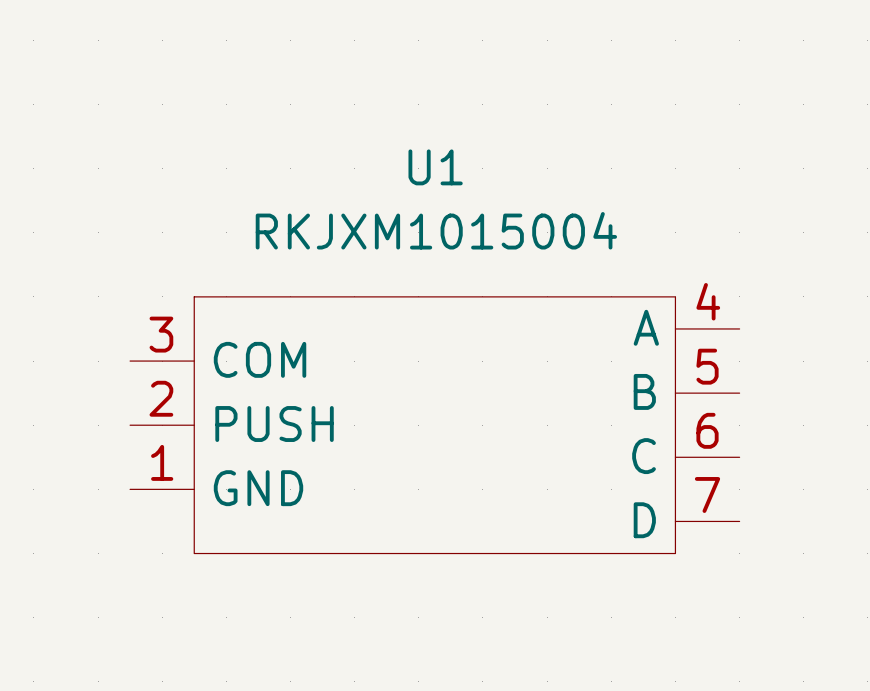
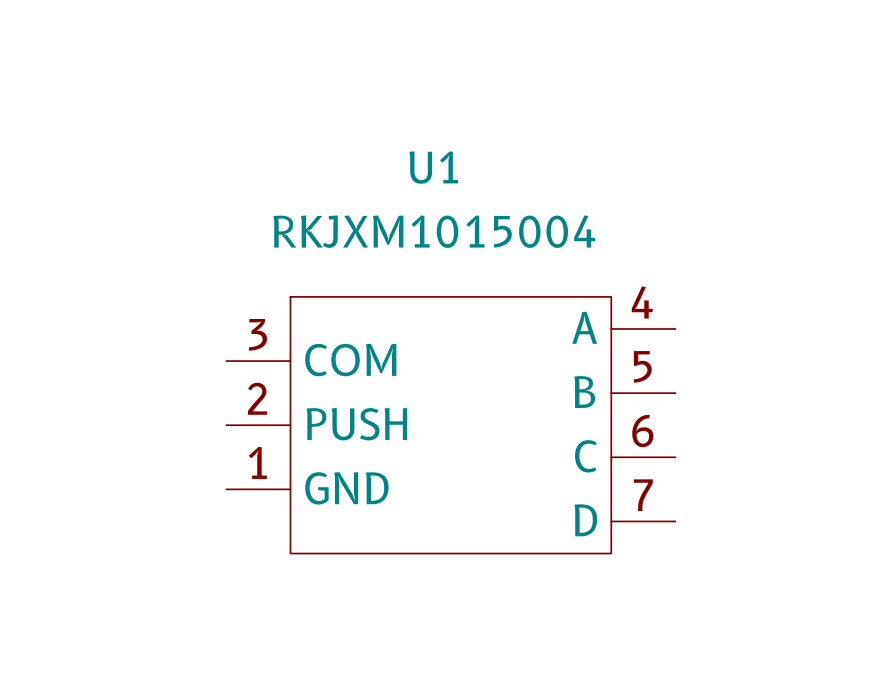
U1 symbol: [130, 296, 740, 554] -> [226, 296, 676, 554]

